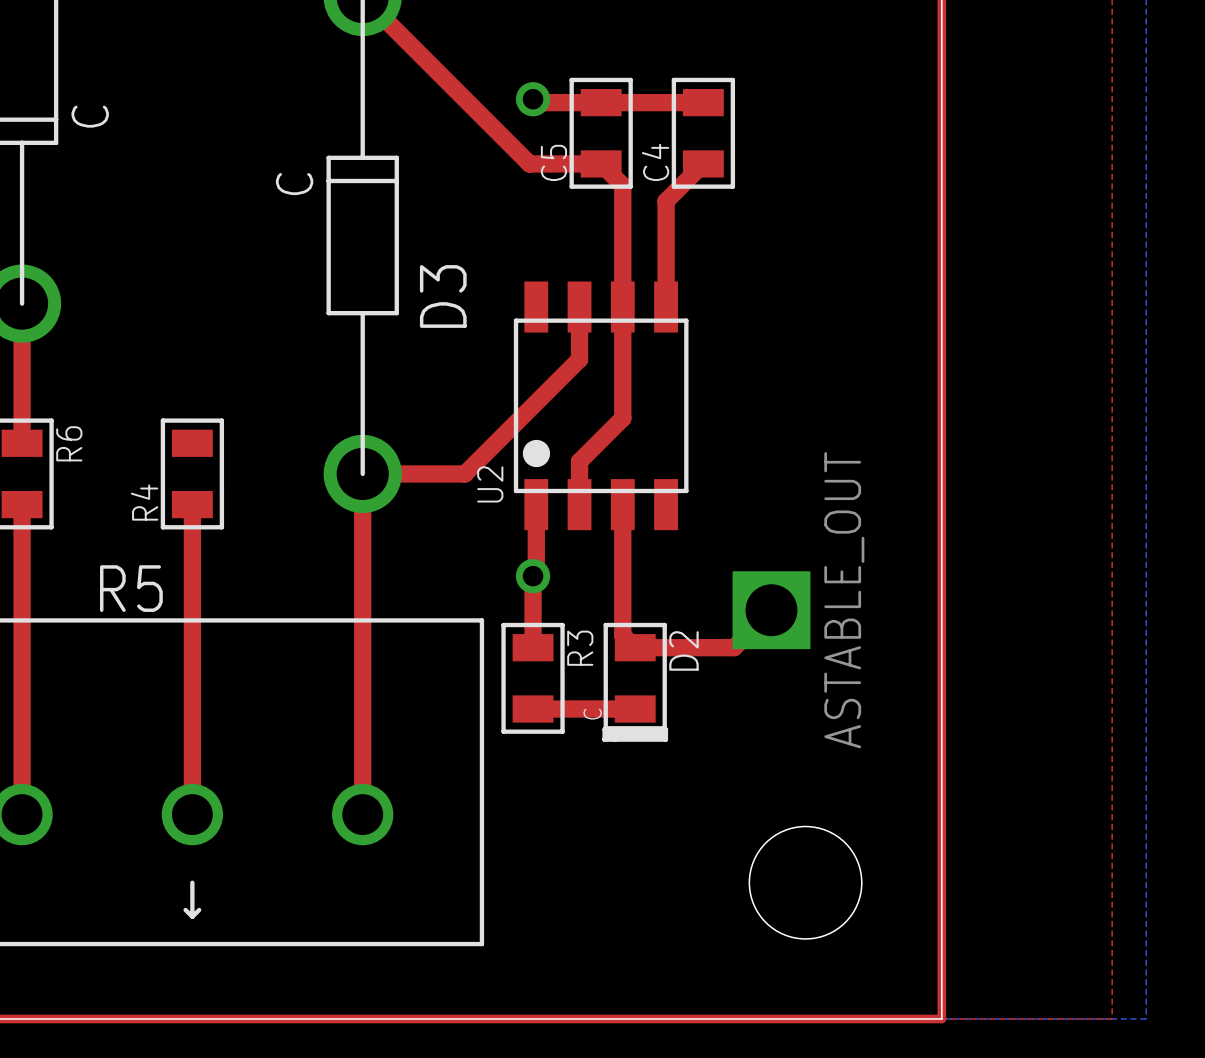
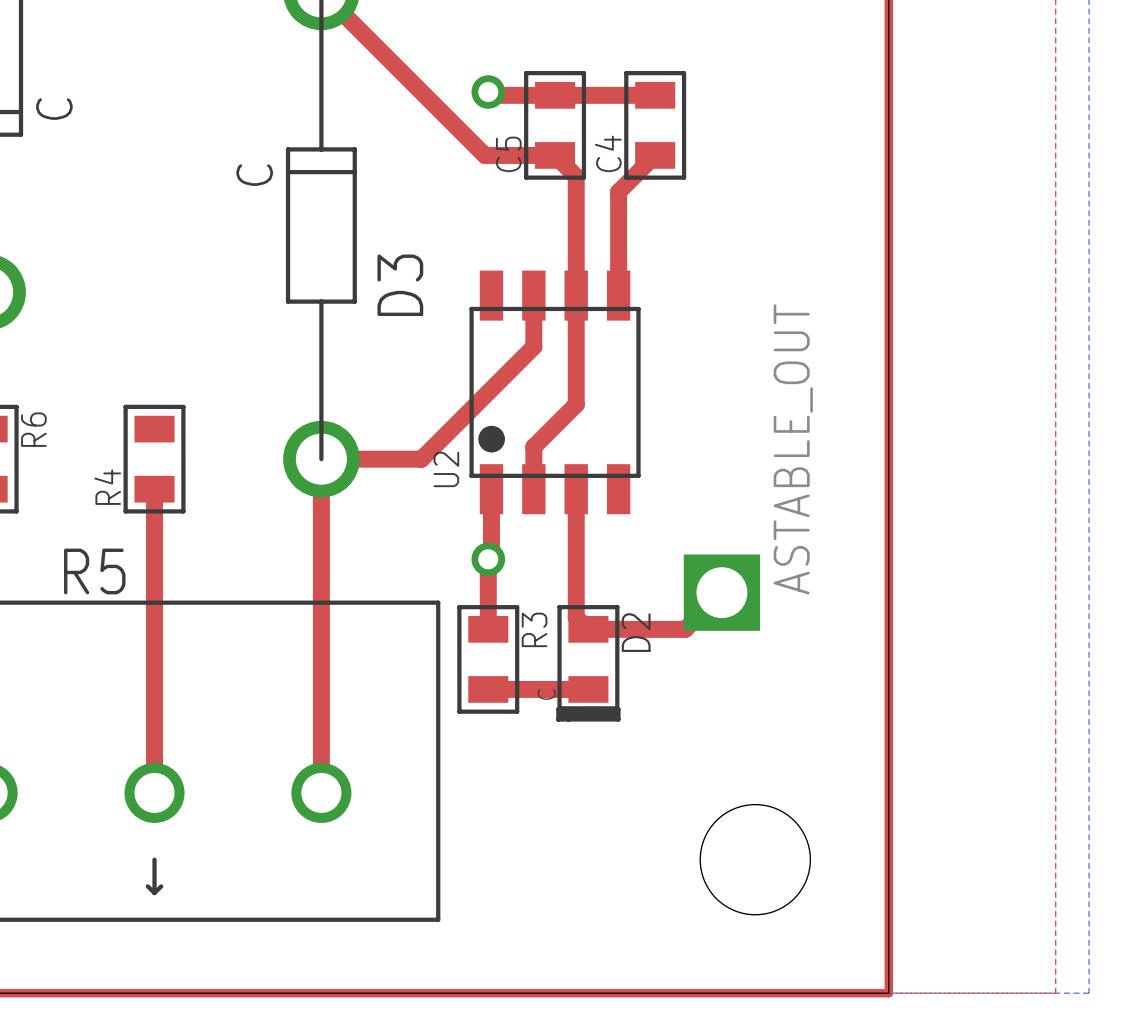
part value position: ASTABLE_OUT (844, 600) -> ASTABLE_OUT (793, 449)

